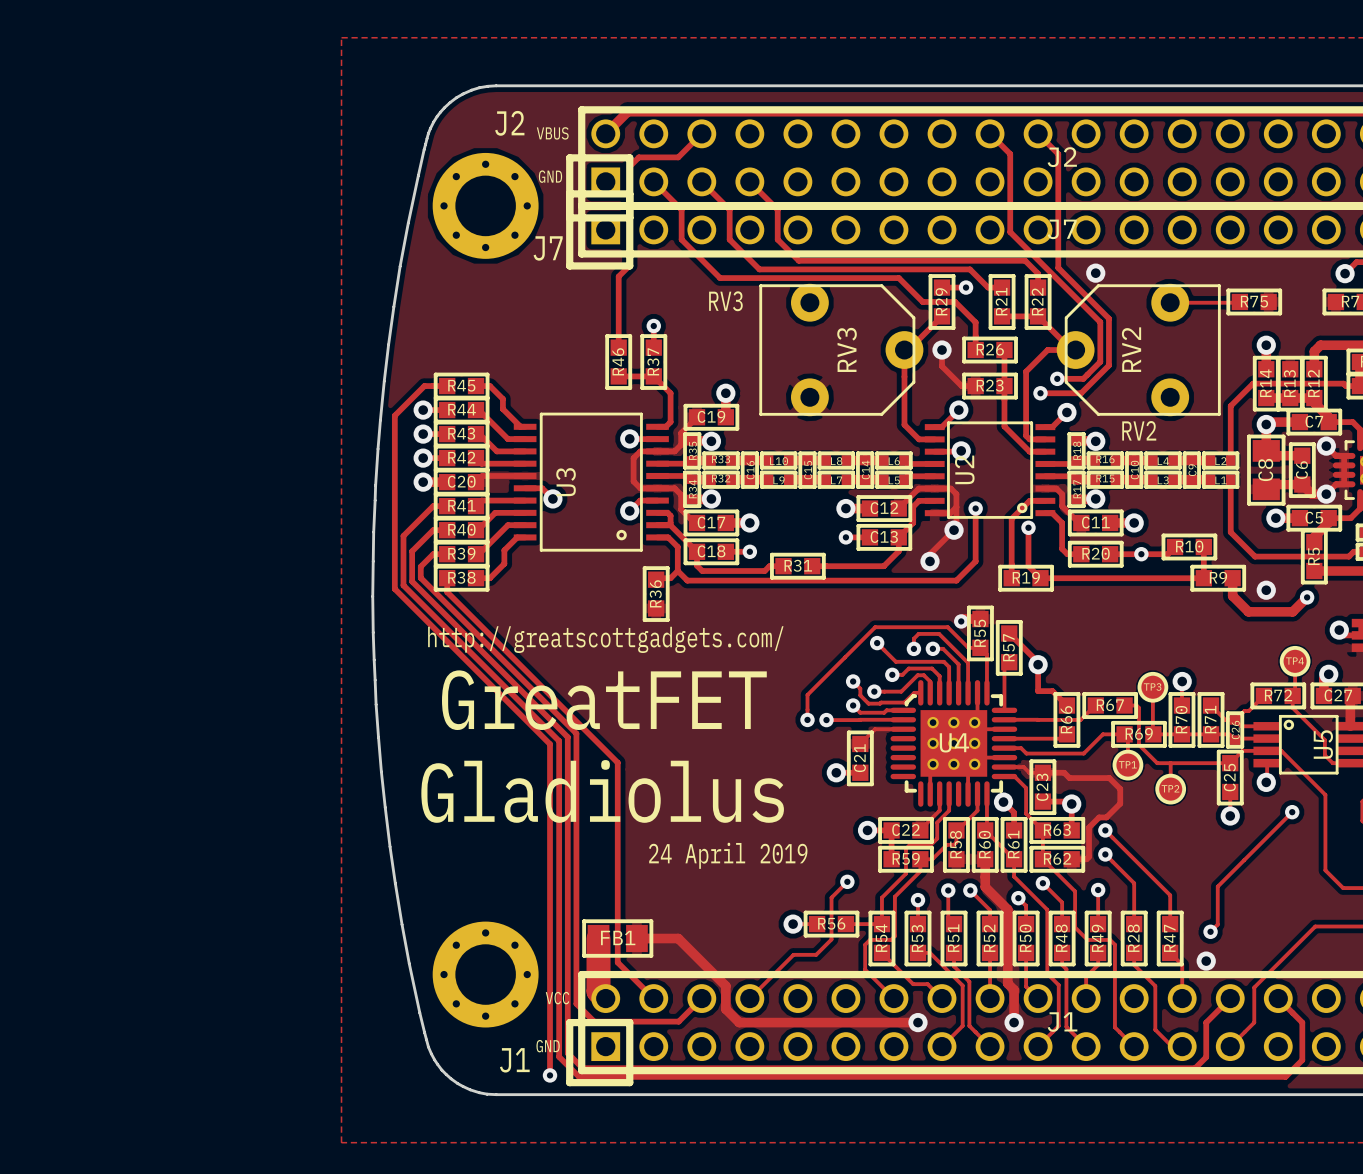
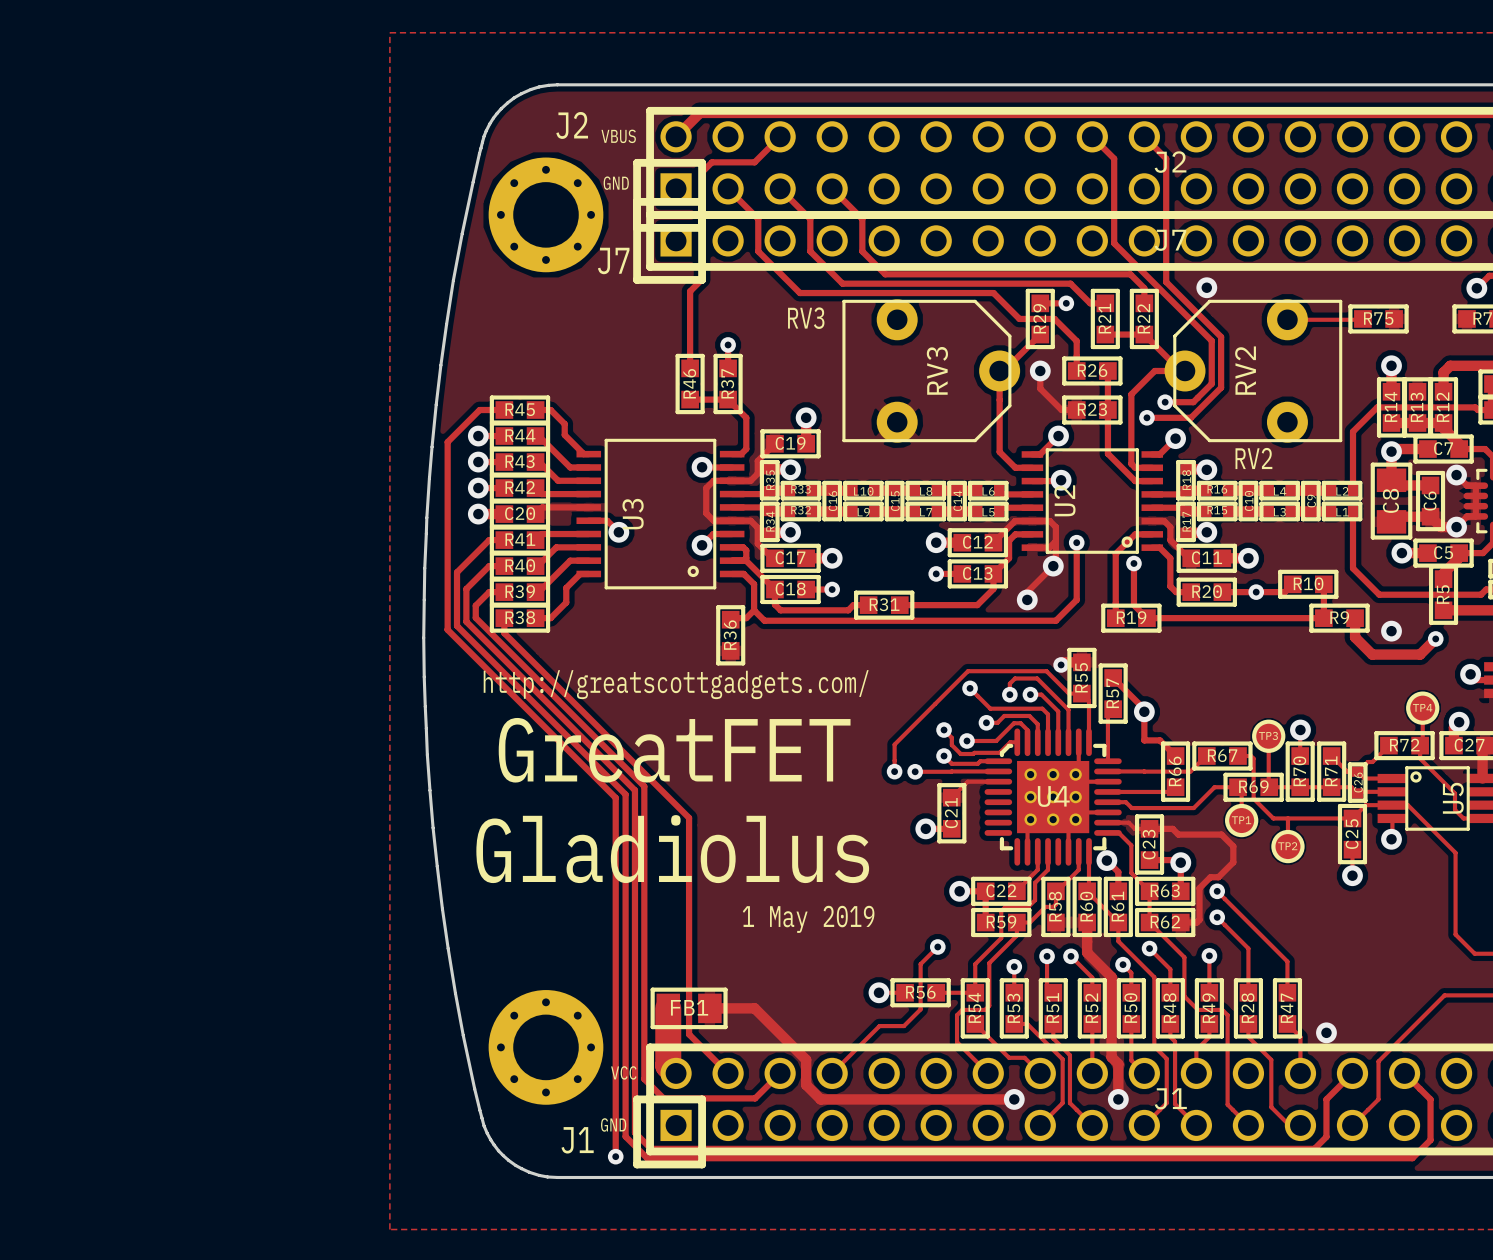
track: (1292, 812) (1217, 886) (1217, 924) (1210, 931) -> none
via: (1292, 812) -> none
text: 24 April 2019 (728, 855) -> 1 May 2019 (808, 919)
via: (1210, 931) -> none

